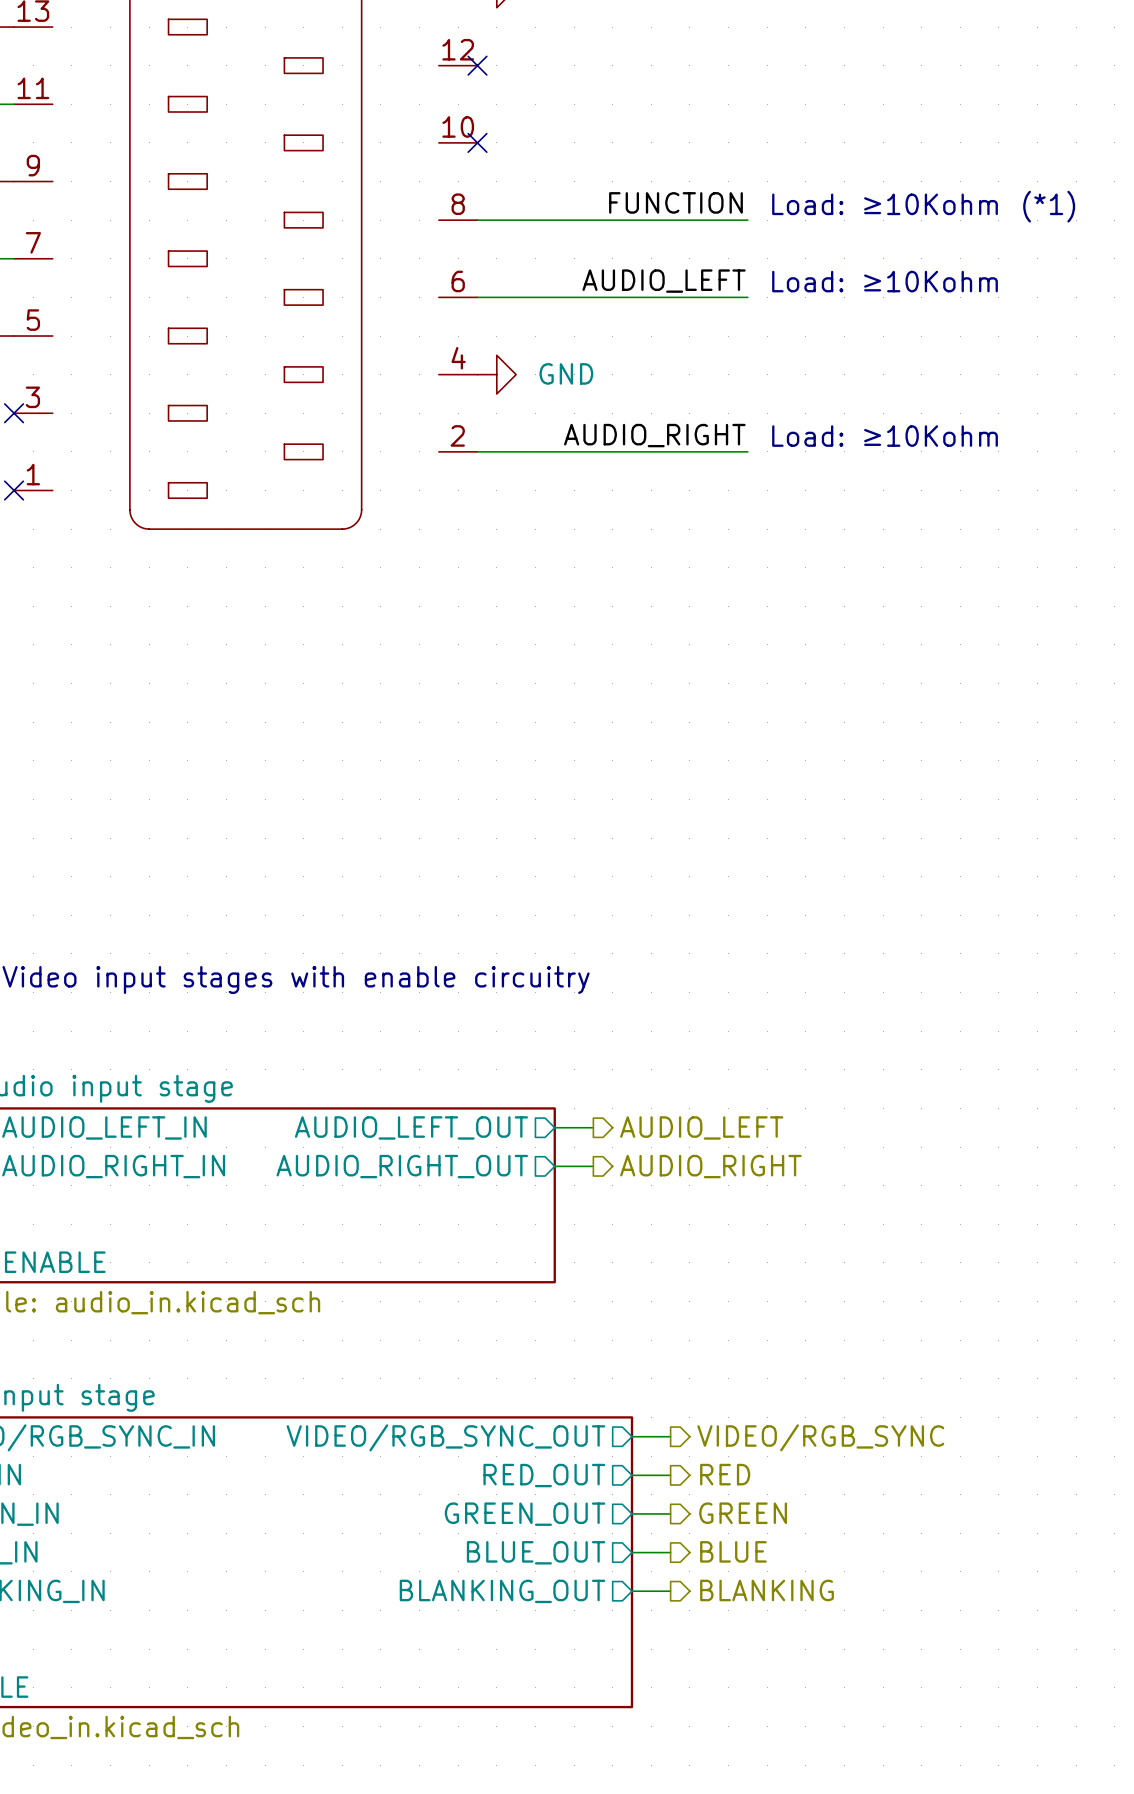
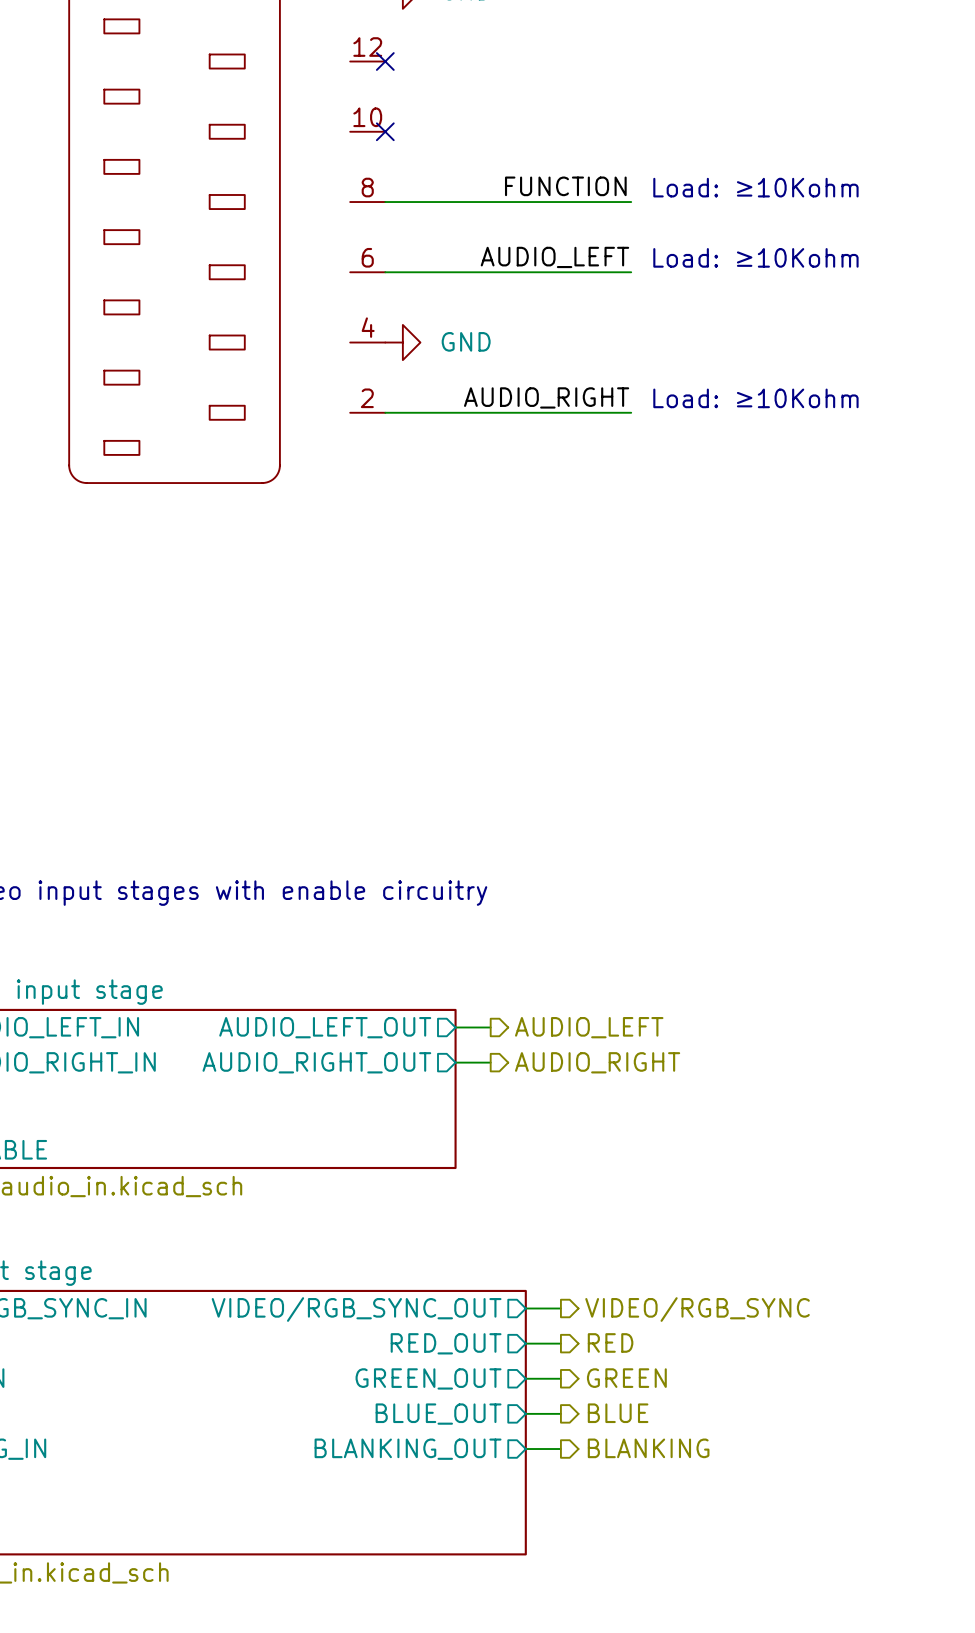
text: (*1) (1049, 206) -> none

